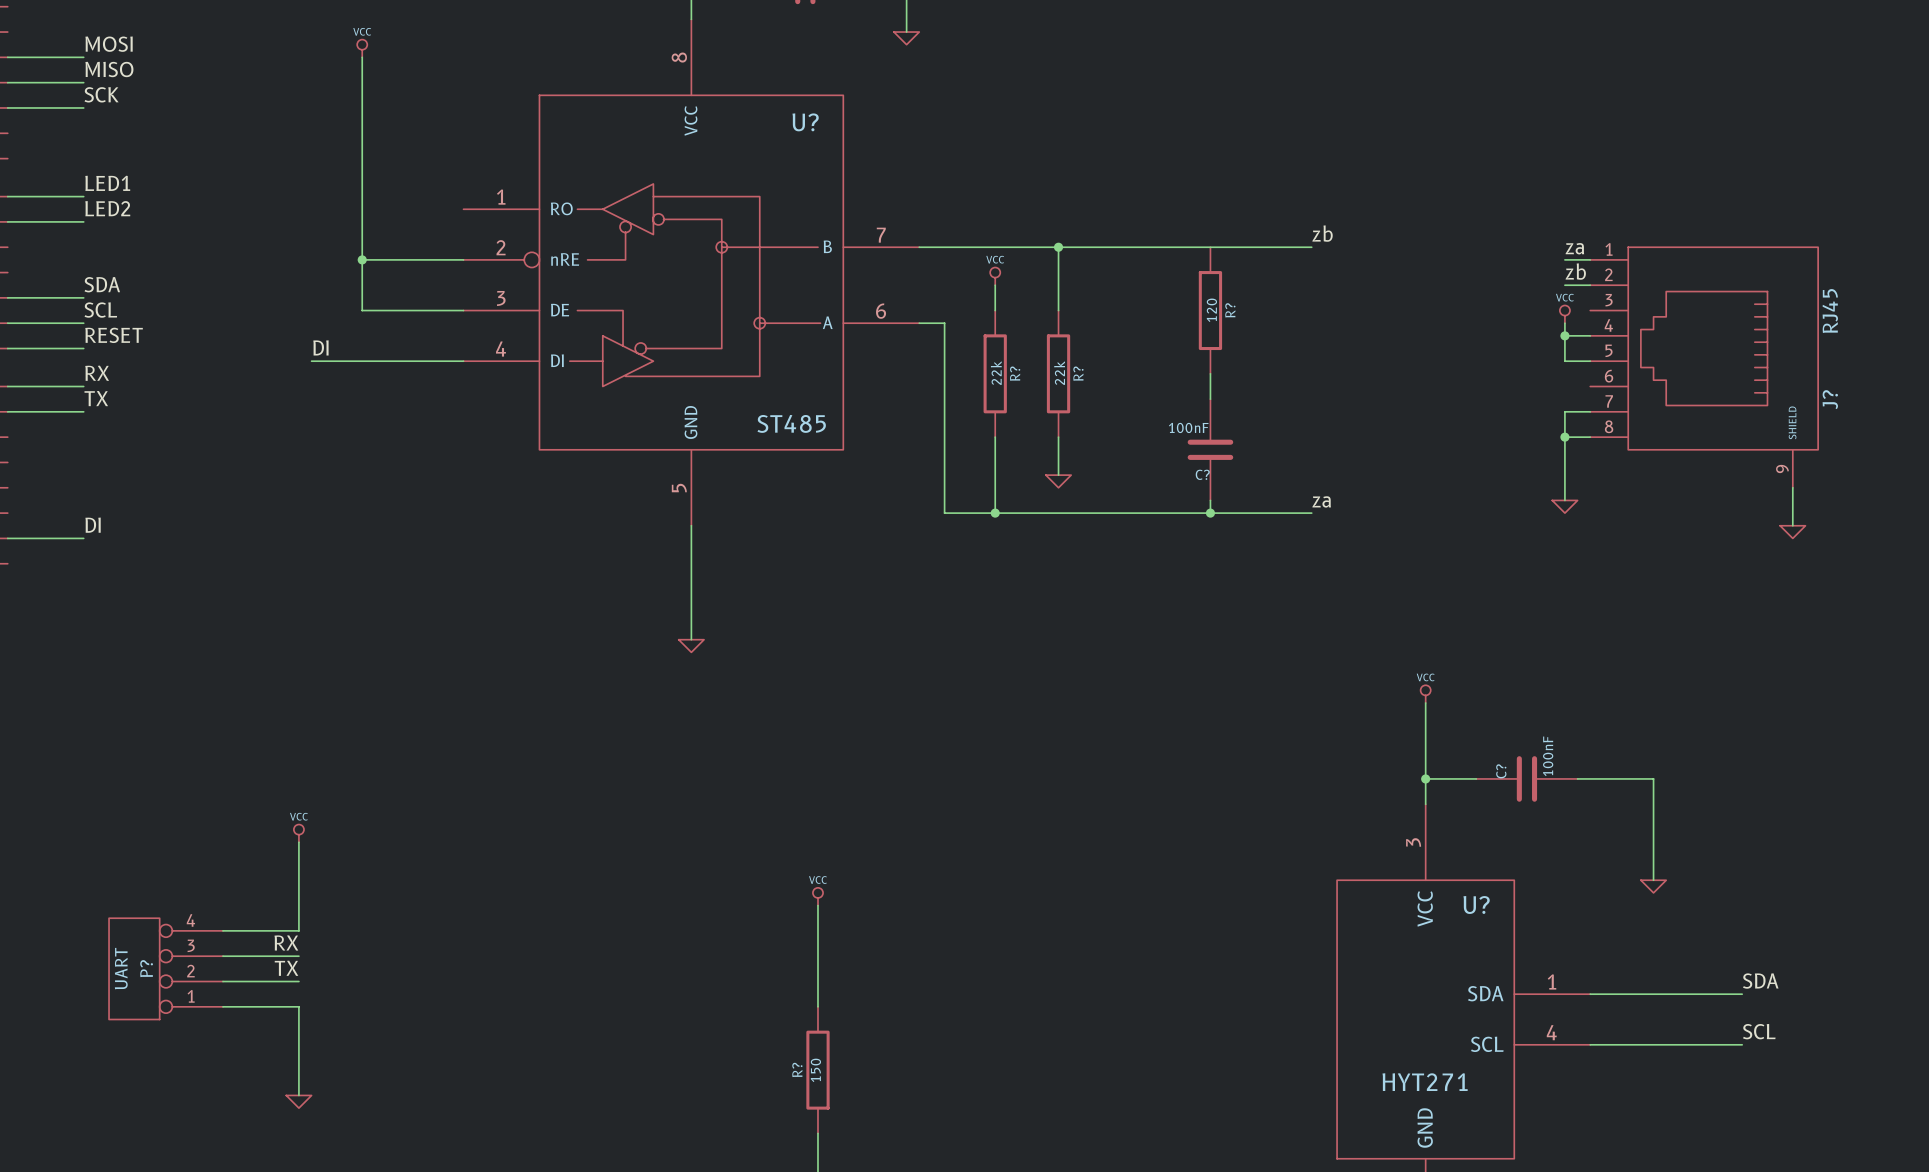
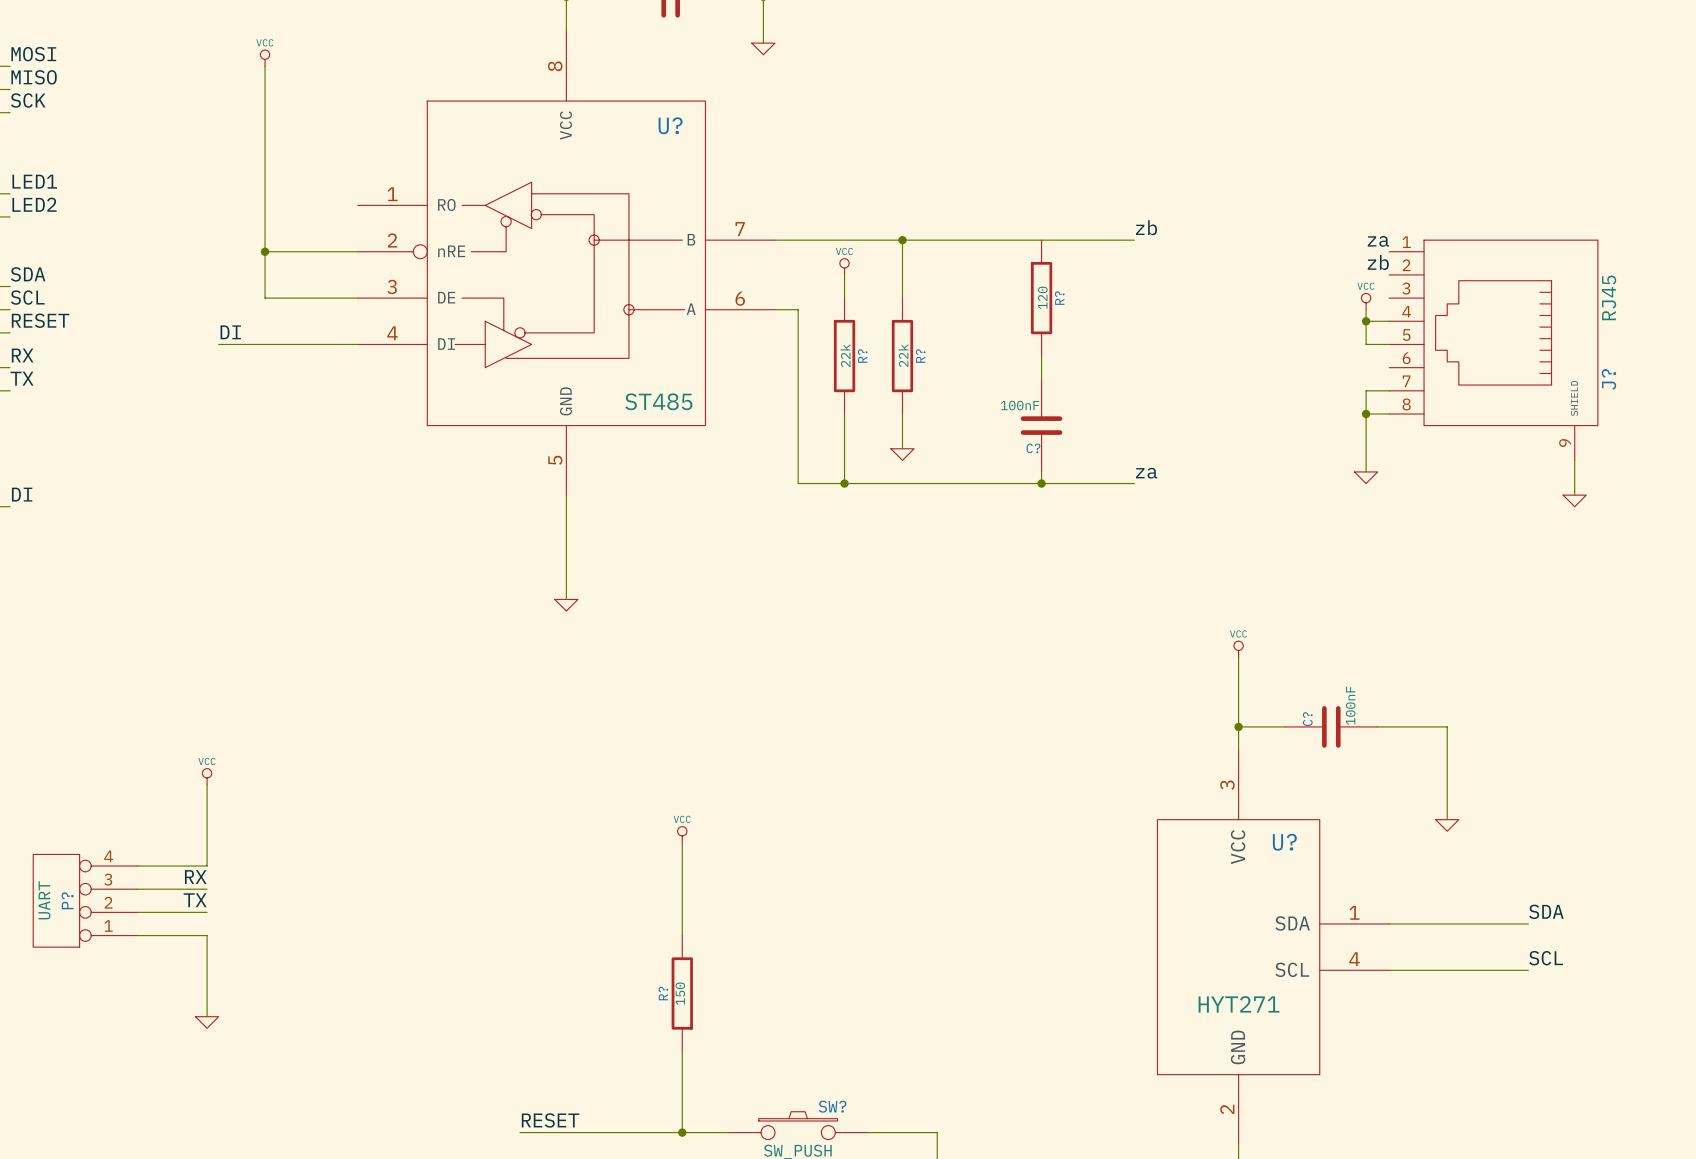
wire: (1564, 259) (1590, 259) -> none
wire: (1564, 285) (1590, 285) -> none

